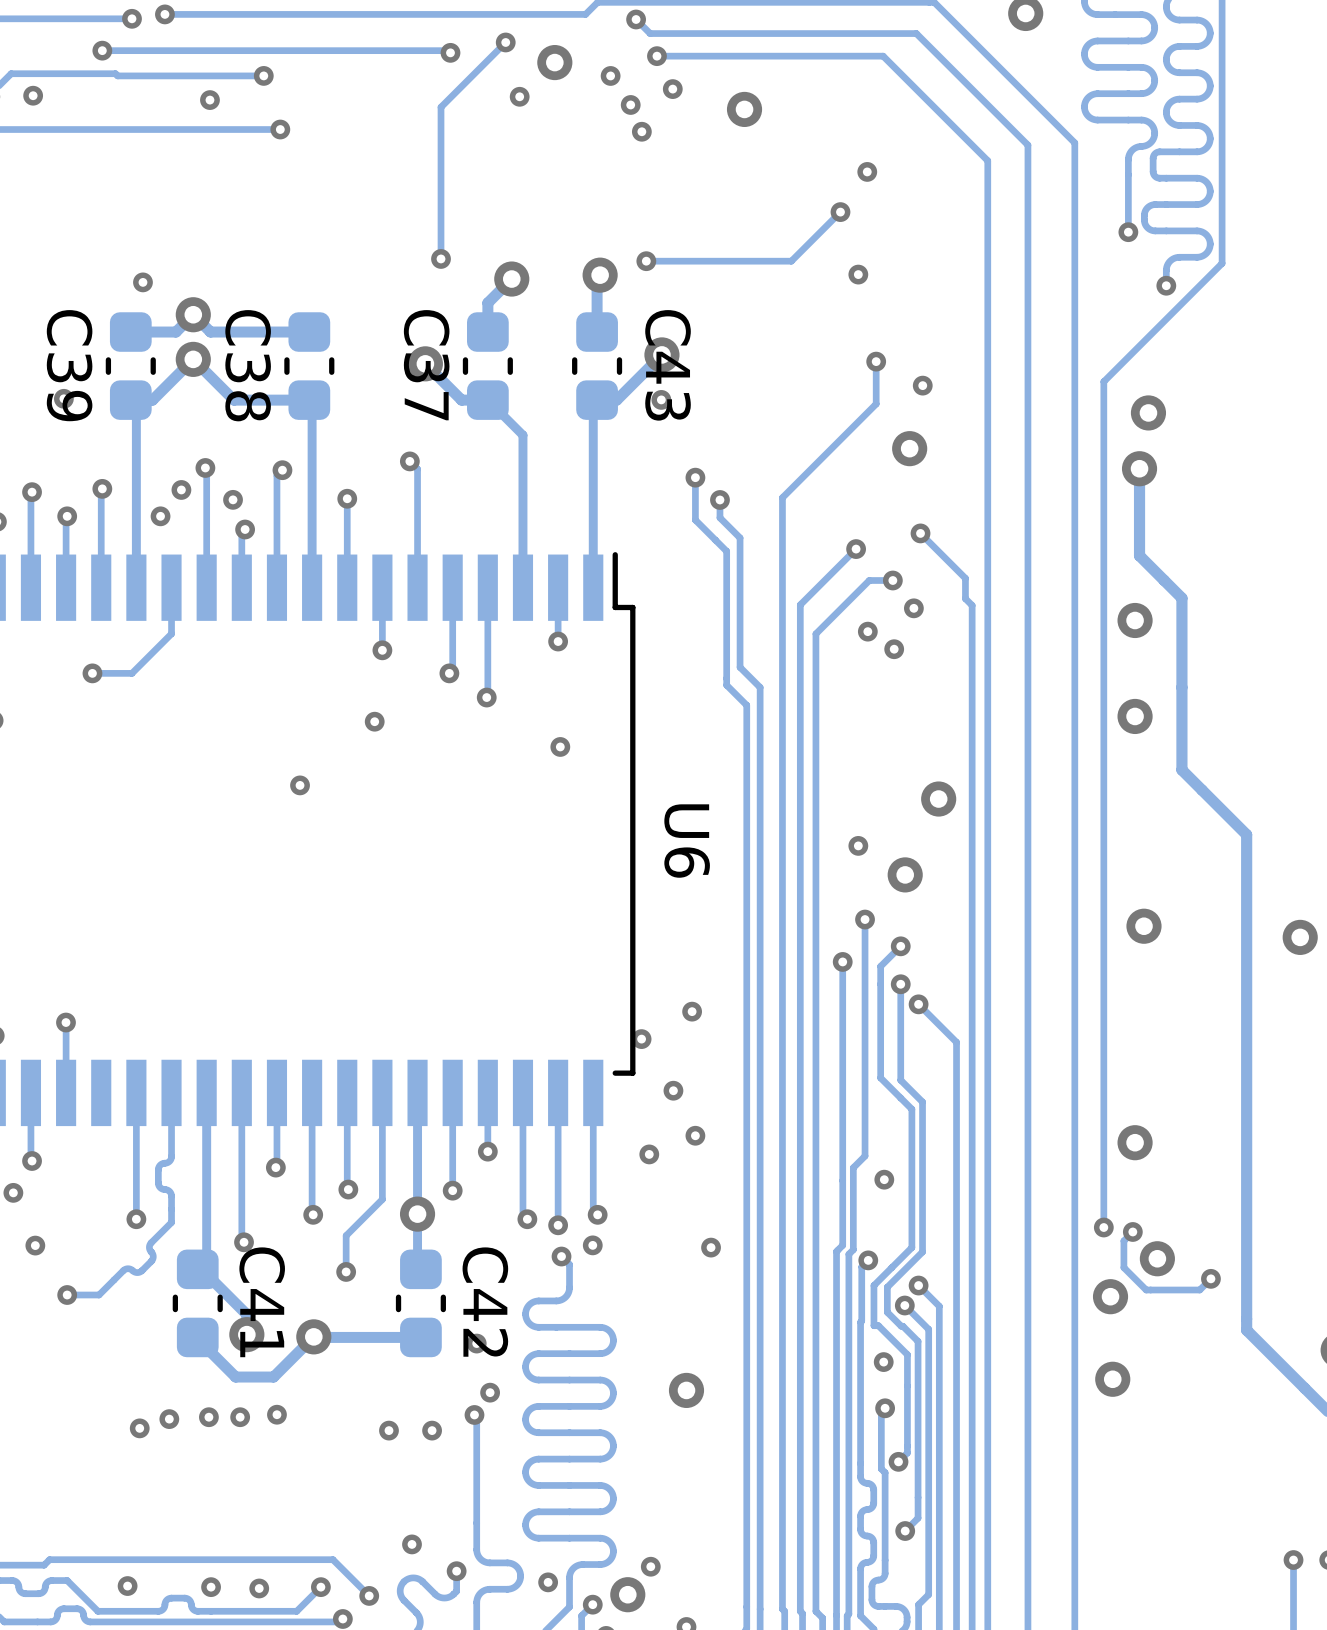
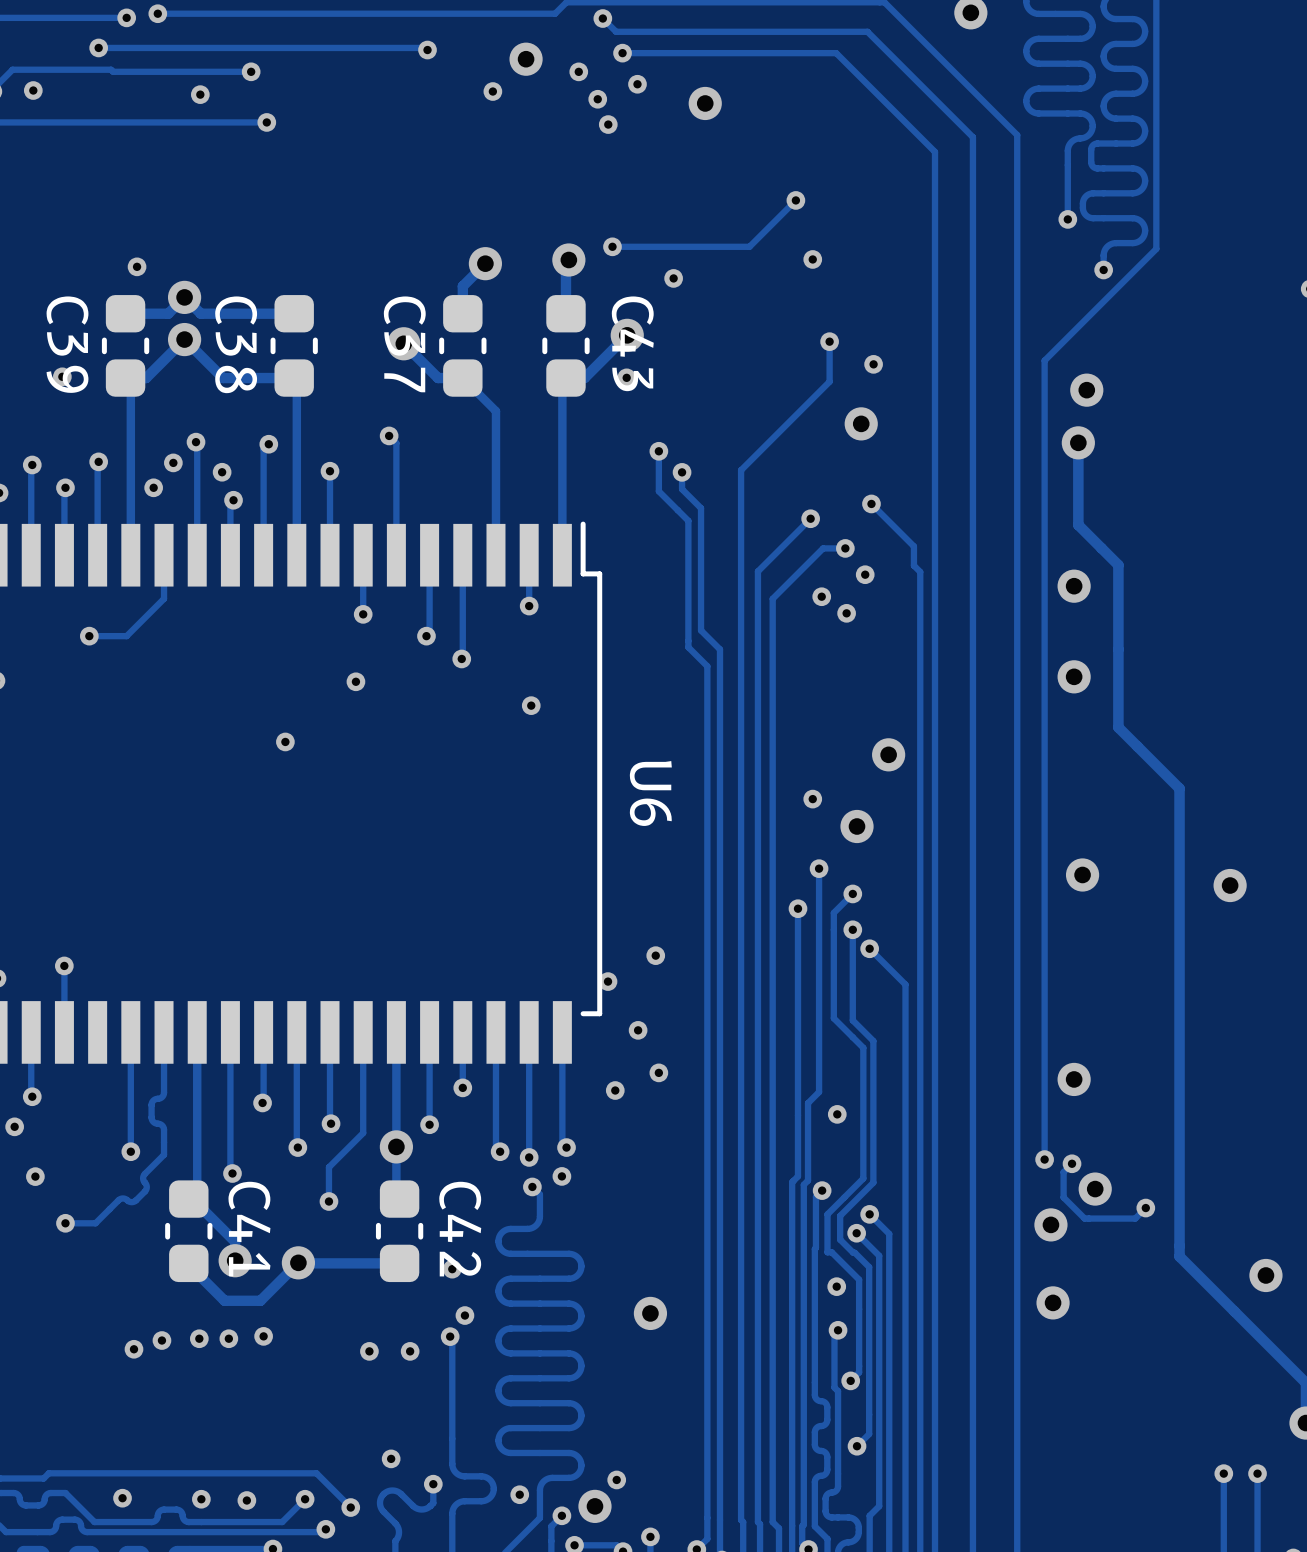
track: (505, 42) (441, 107) (441, 258) -> none
via: (505, 42) -> none
via: (867, 171) -> none
via: (441, 258) -> none
via: none -> (673, 278)
via: (711, 1247) -> none

